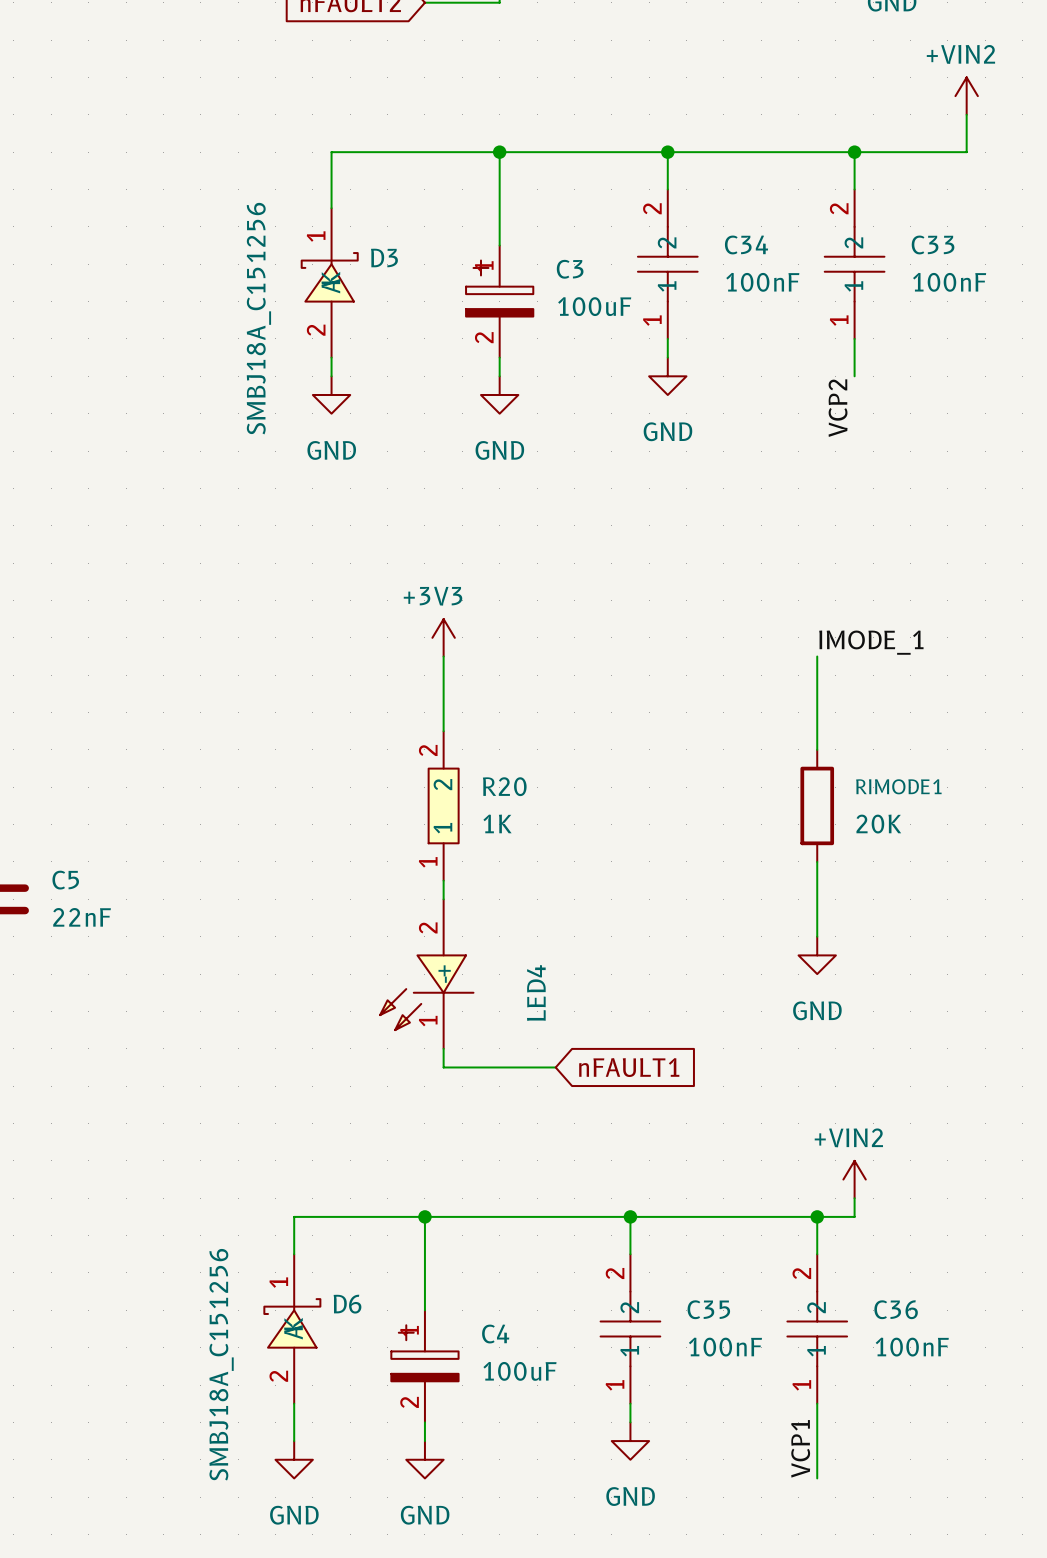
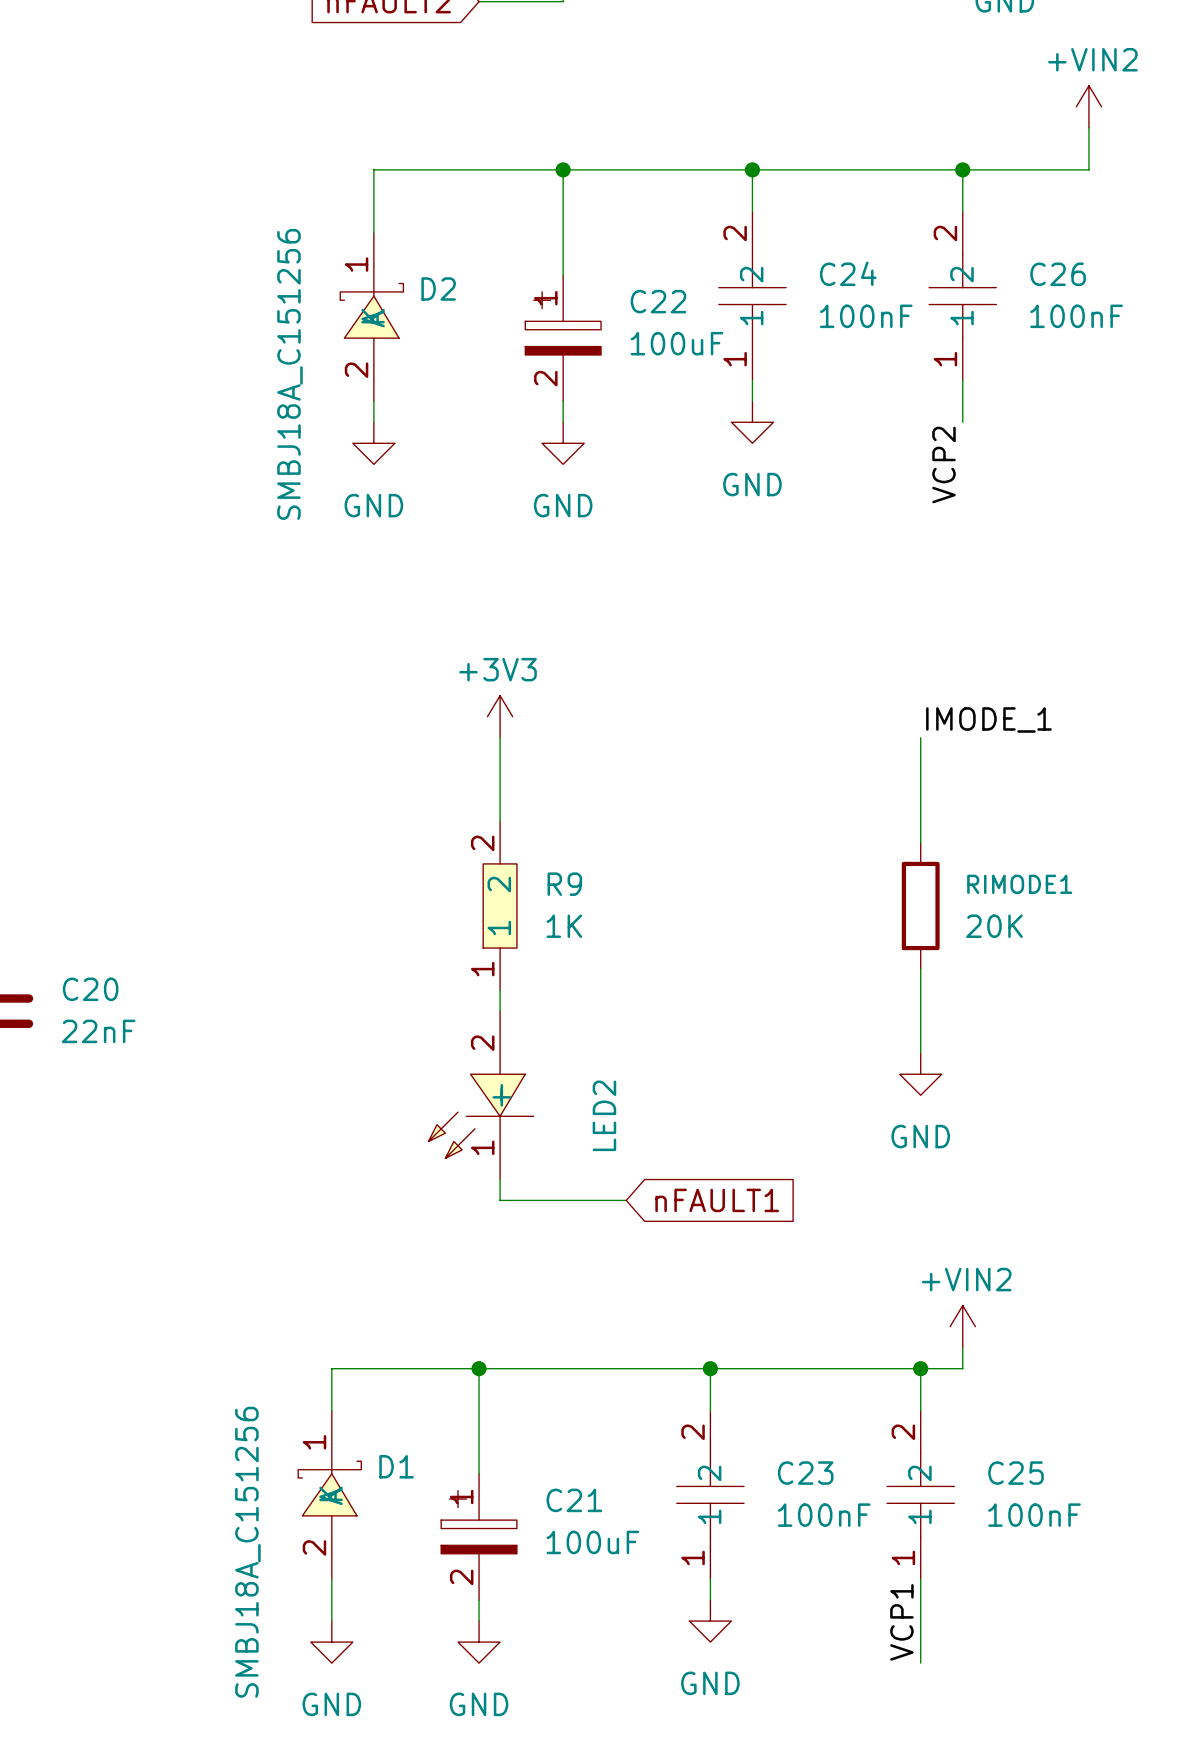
C34 name: C34 (746, 244) -> C24 (848, 273)
C33 name: C33 (933, 244) -> C26 (1058, 274)
D3 name: D3 (384, 258) -> D2 (438, 289)
C3 name: C3 (570, 269) -> C22 (658, 301)
R20 name: R20 (504, 786) -> R9 (564, 884)
C5 name: C5 (65, 880) -> C20 (90, 989)
LED4 name: LED4 (536, 993) -> LED2 (604, 1115)
D6 name: D6 (347, 1304) -> D1 (396, 1466)
C35 name: C35 (708, 1309) -> C23 (805, 1473)
C36 name: C36 (896, 1309) -> C25 (1016, 1473)
C4 name: C4 (495, 1334) -> C21 (574, 1500)

